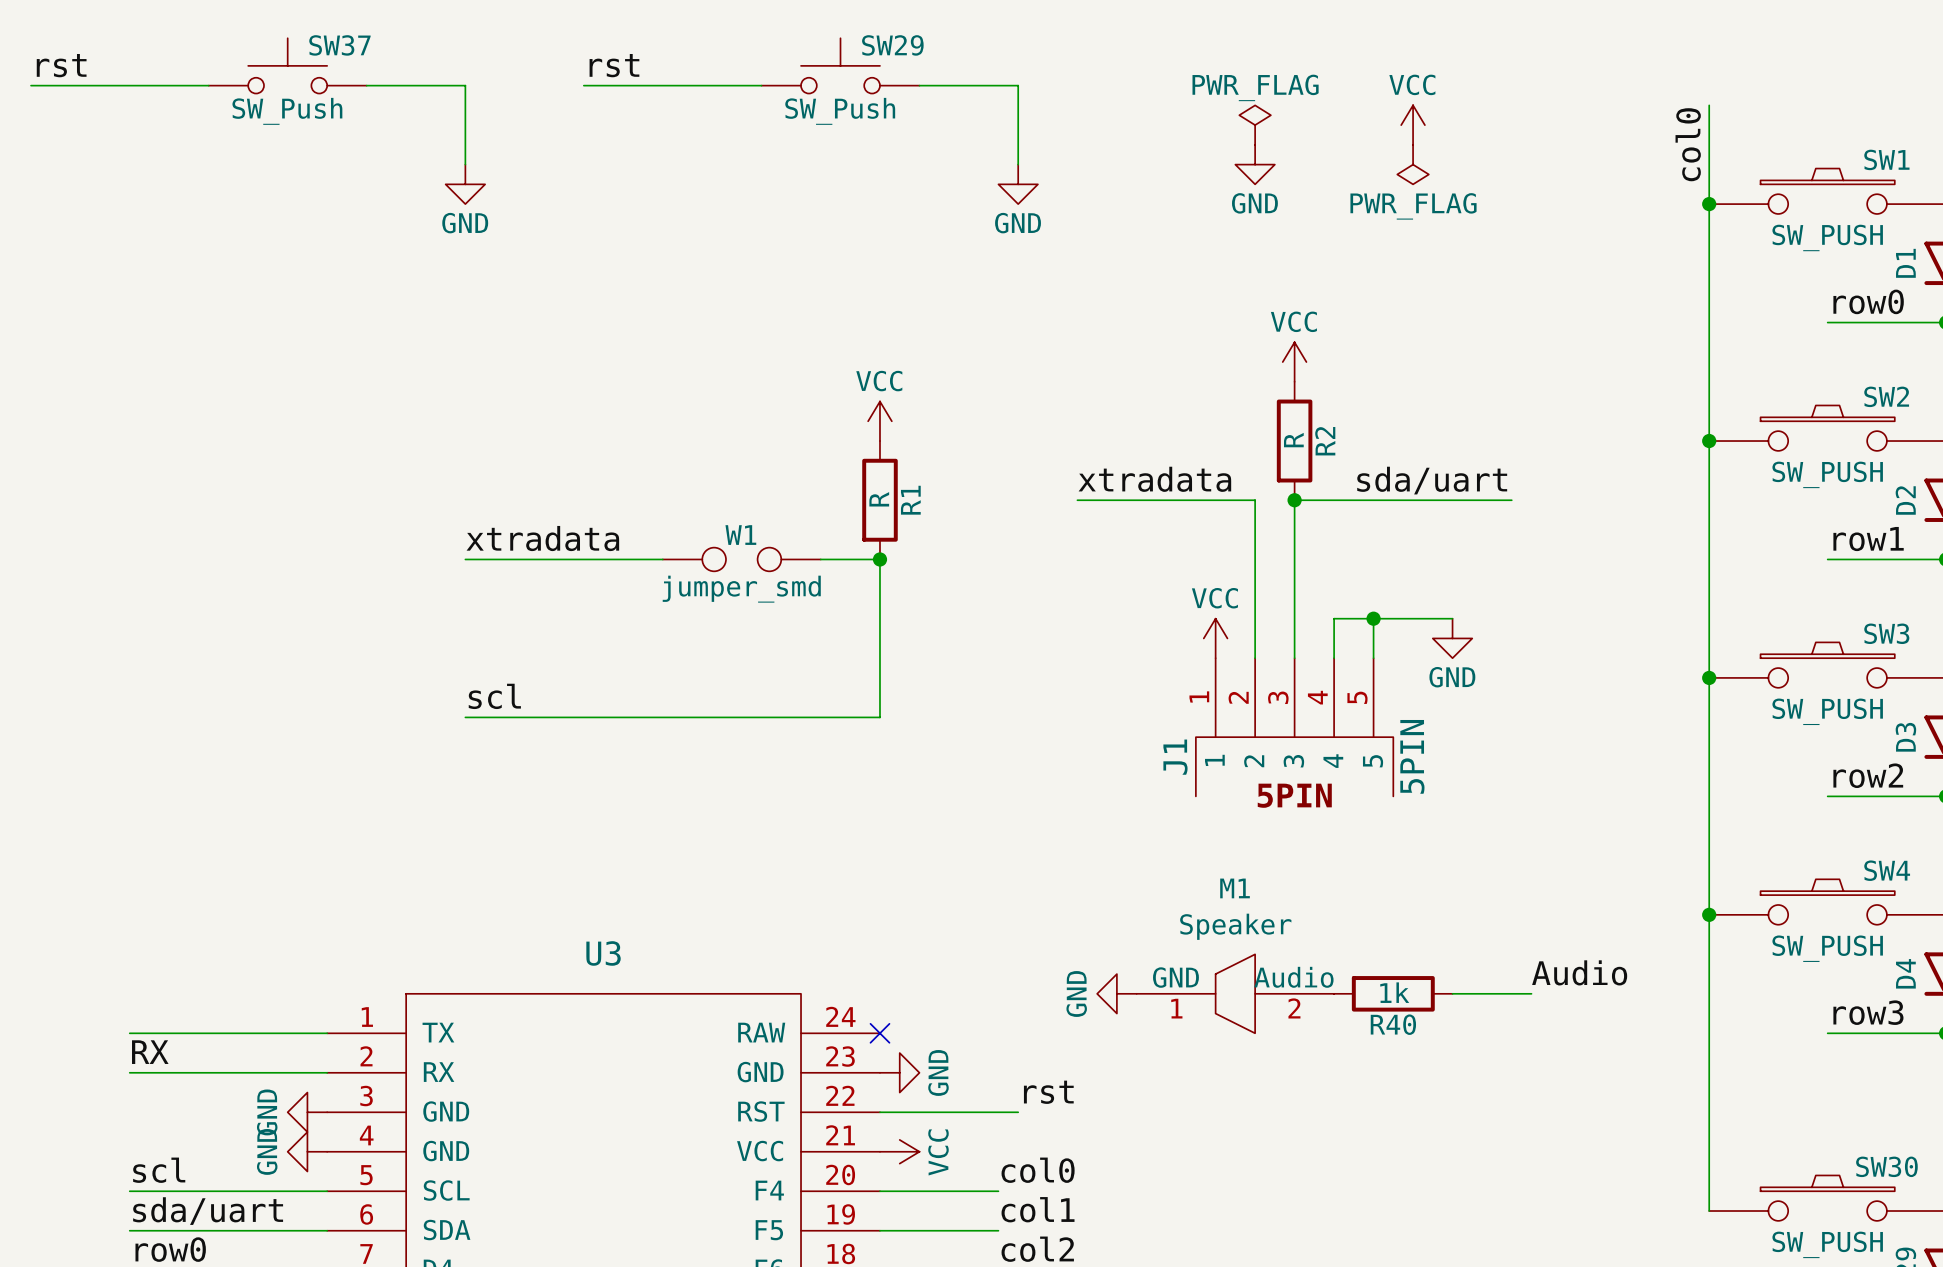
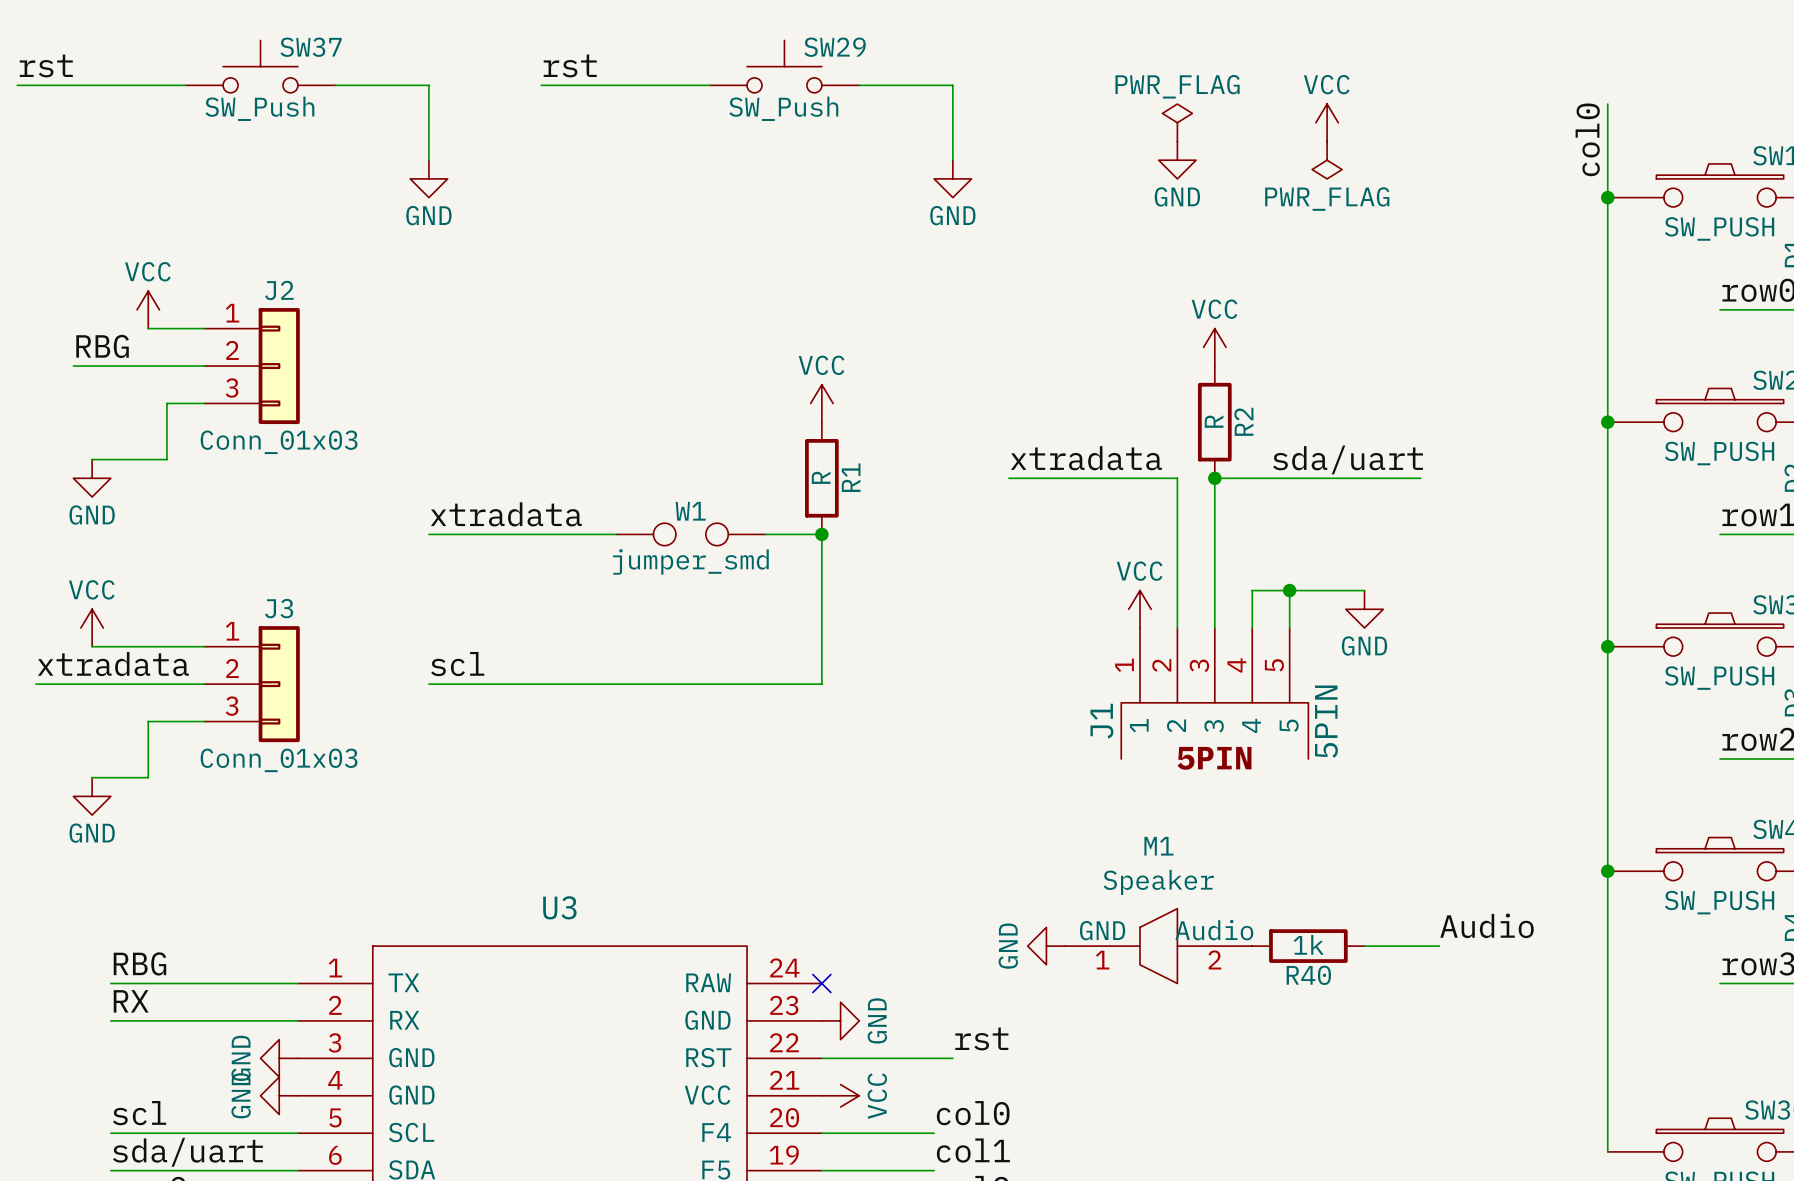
power symbol: none -> VCC (148, 309)
wire: none -> (148, 328) (204, 328)
label: none -> RBG (102, 346)
wire: none -> (73, 366) (204, 366)
J2: none -> Conn_01x03 (252, 366)
wire: none -> (204, 403) (166, 403) (166, 459) (92, 459)
power symbol: none -> GND (92, 478)
power symbol: none -> VCC (92, 627)
wire: none -> (92, 646) (204, 646)
label: none -> xtradata (113, 664)
wire: none -> (35, 684) (204, 684)
J3: none -> Conn_01x03 (252, 684)
wire: none -> (204, 721) (148, 721) (148, 777) (92, 777)
power symbol: none -> GND (92, 796)
label: none -> RBG (139, 963)

